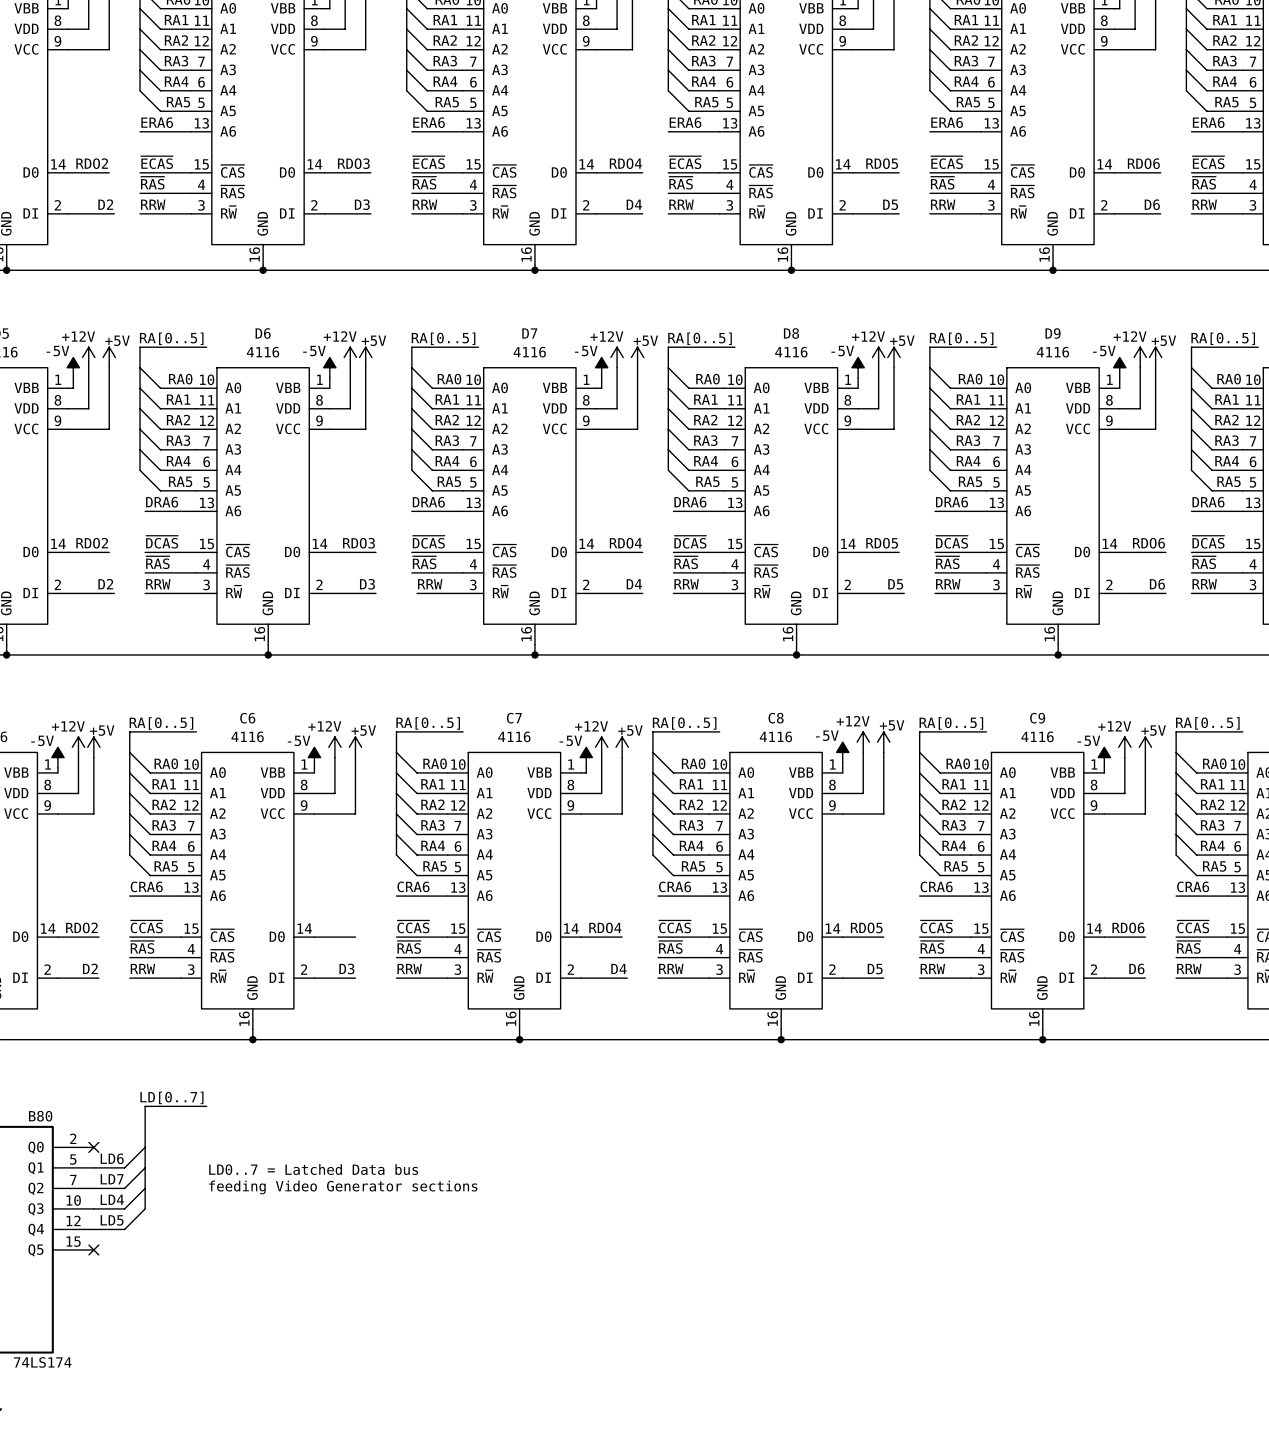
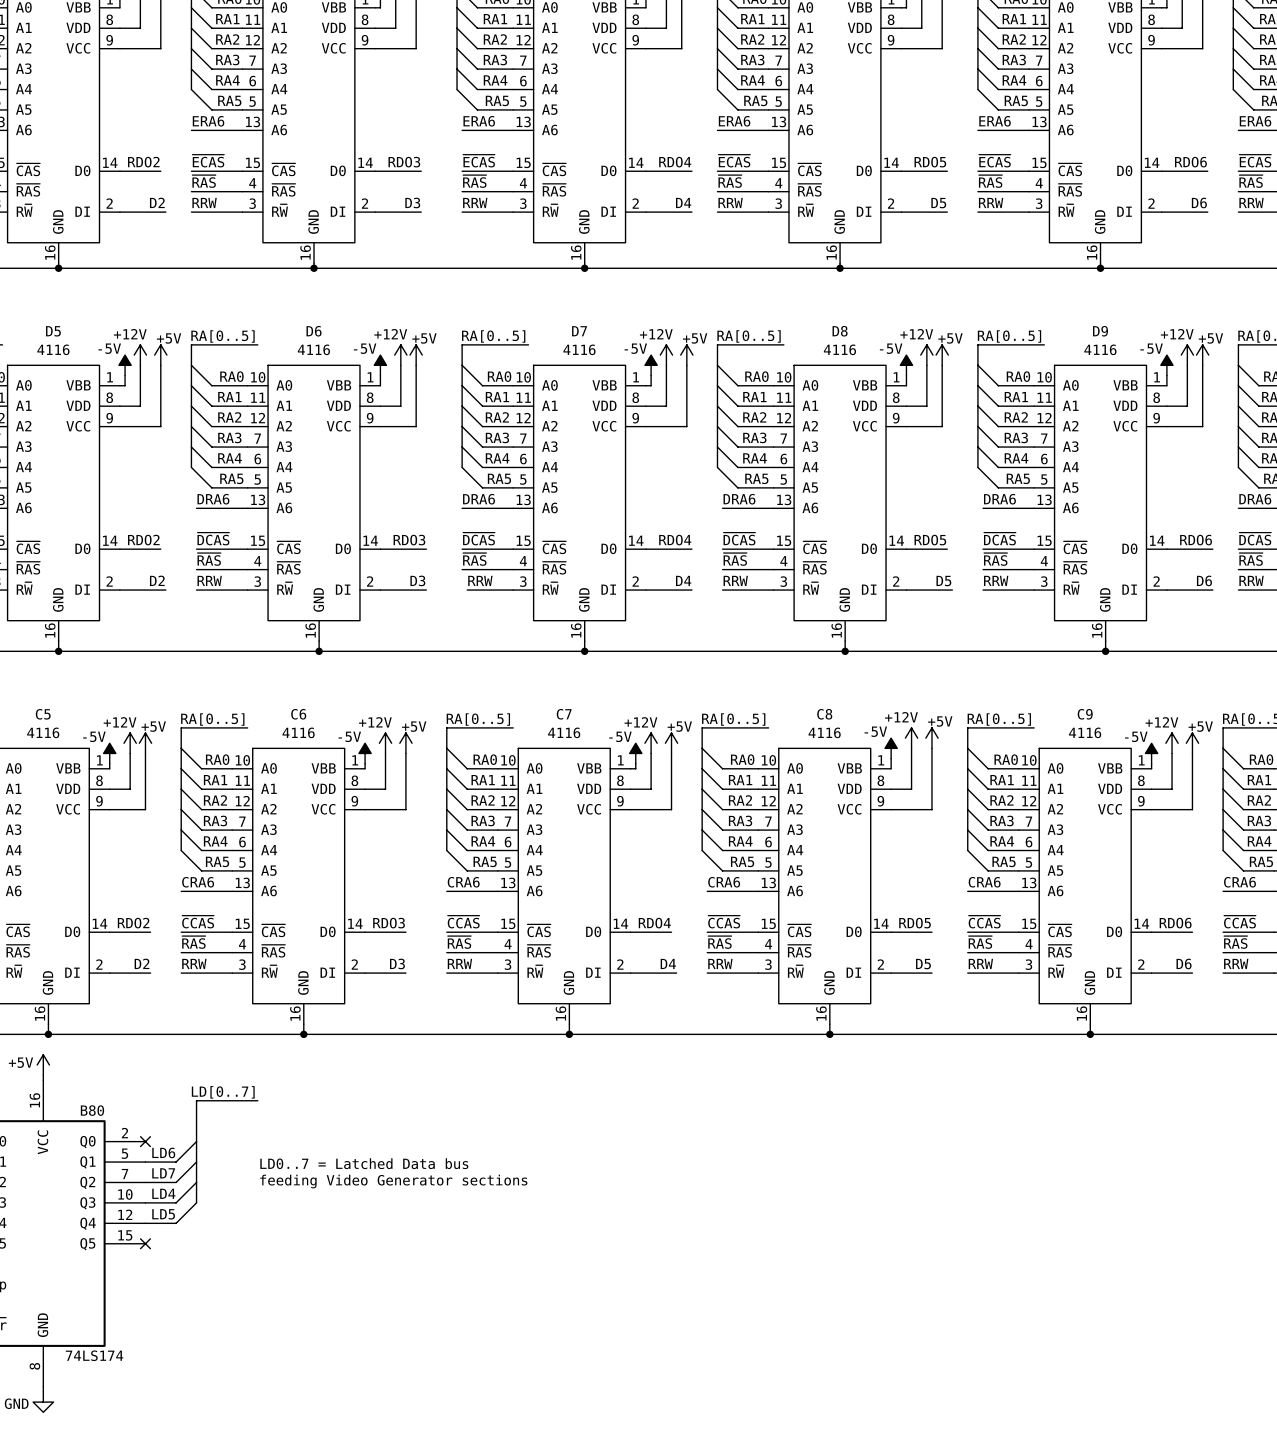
label: none -> RDO3 (389, 923)

